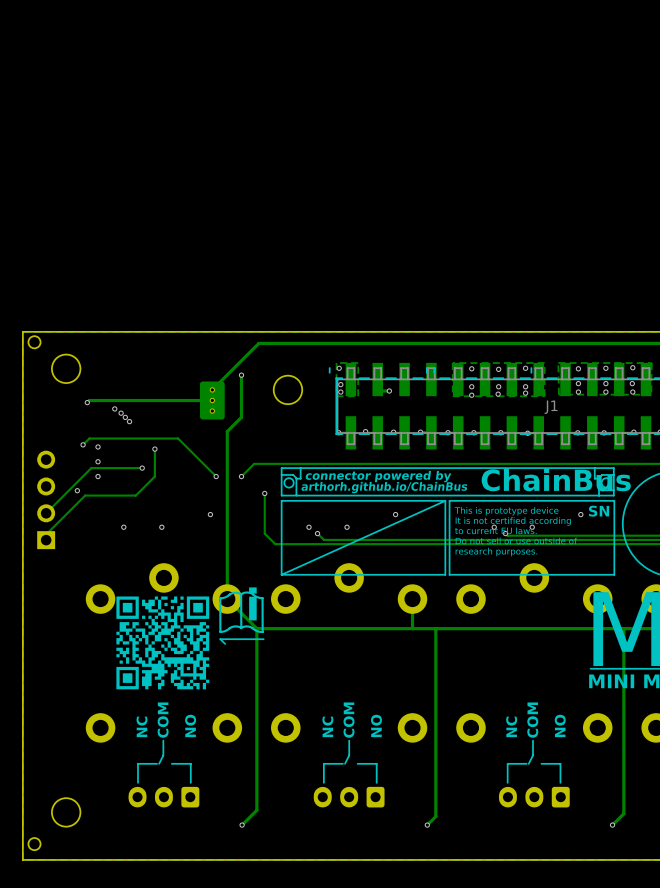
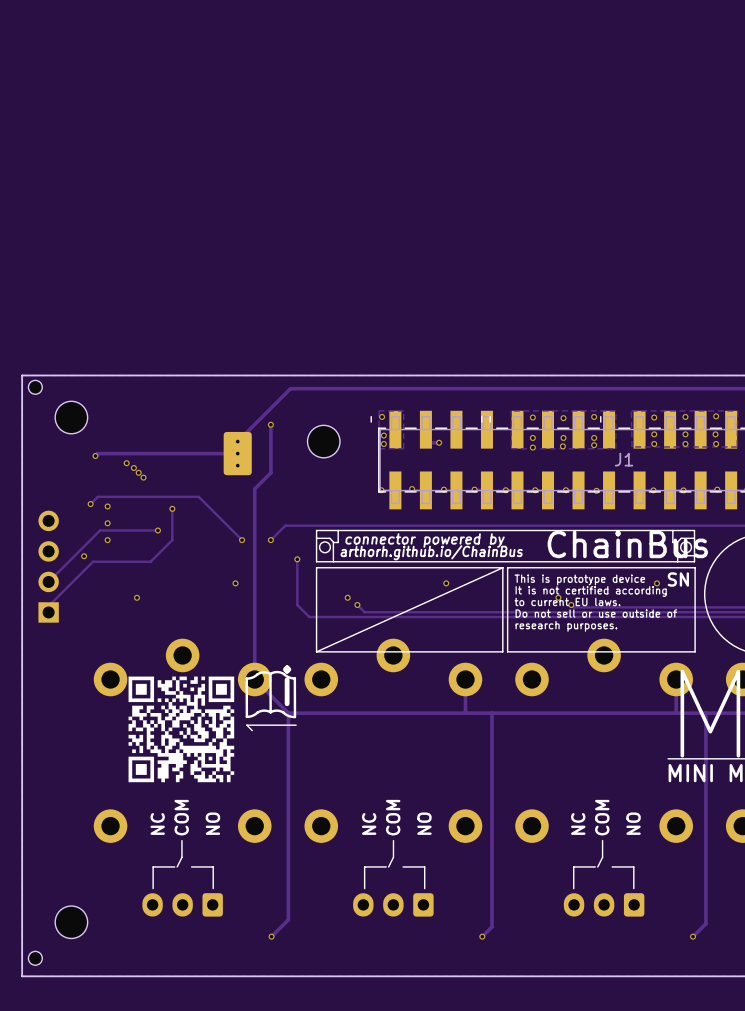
via: (161, 527) -> none
via: (347, 527) -> none
via: (532, 527) -> none

